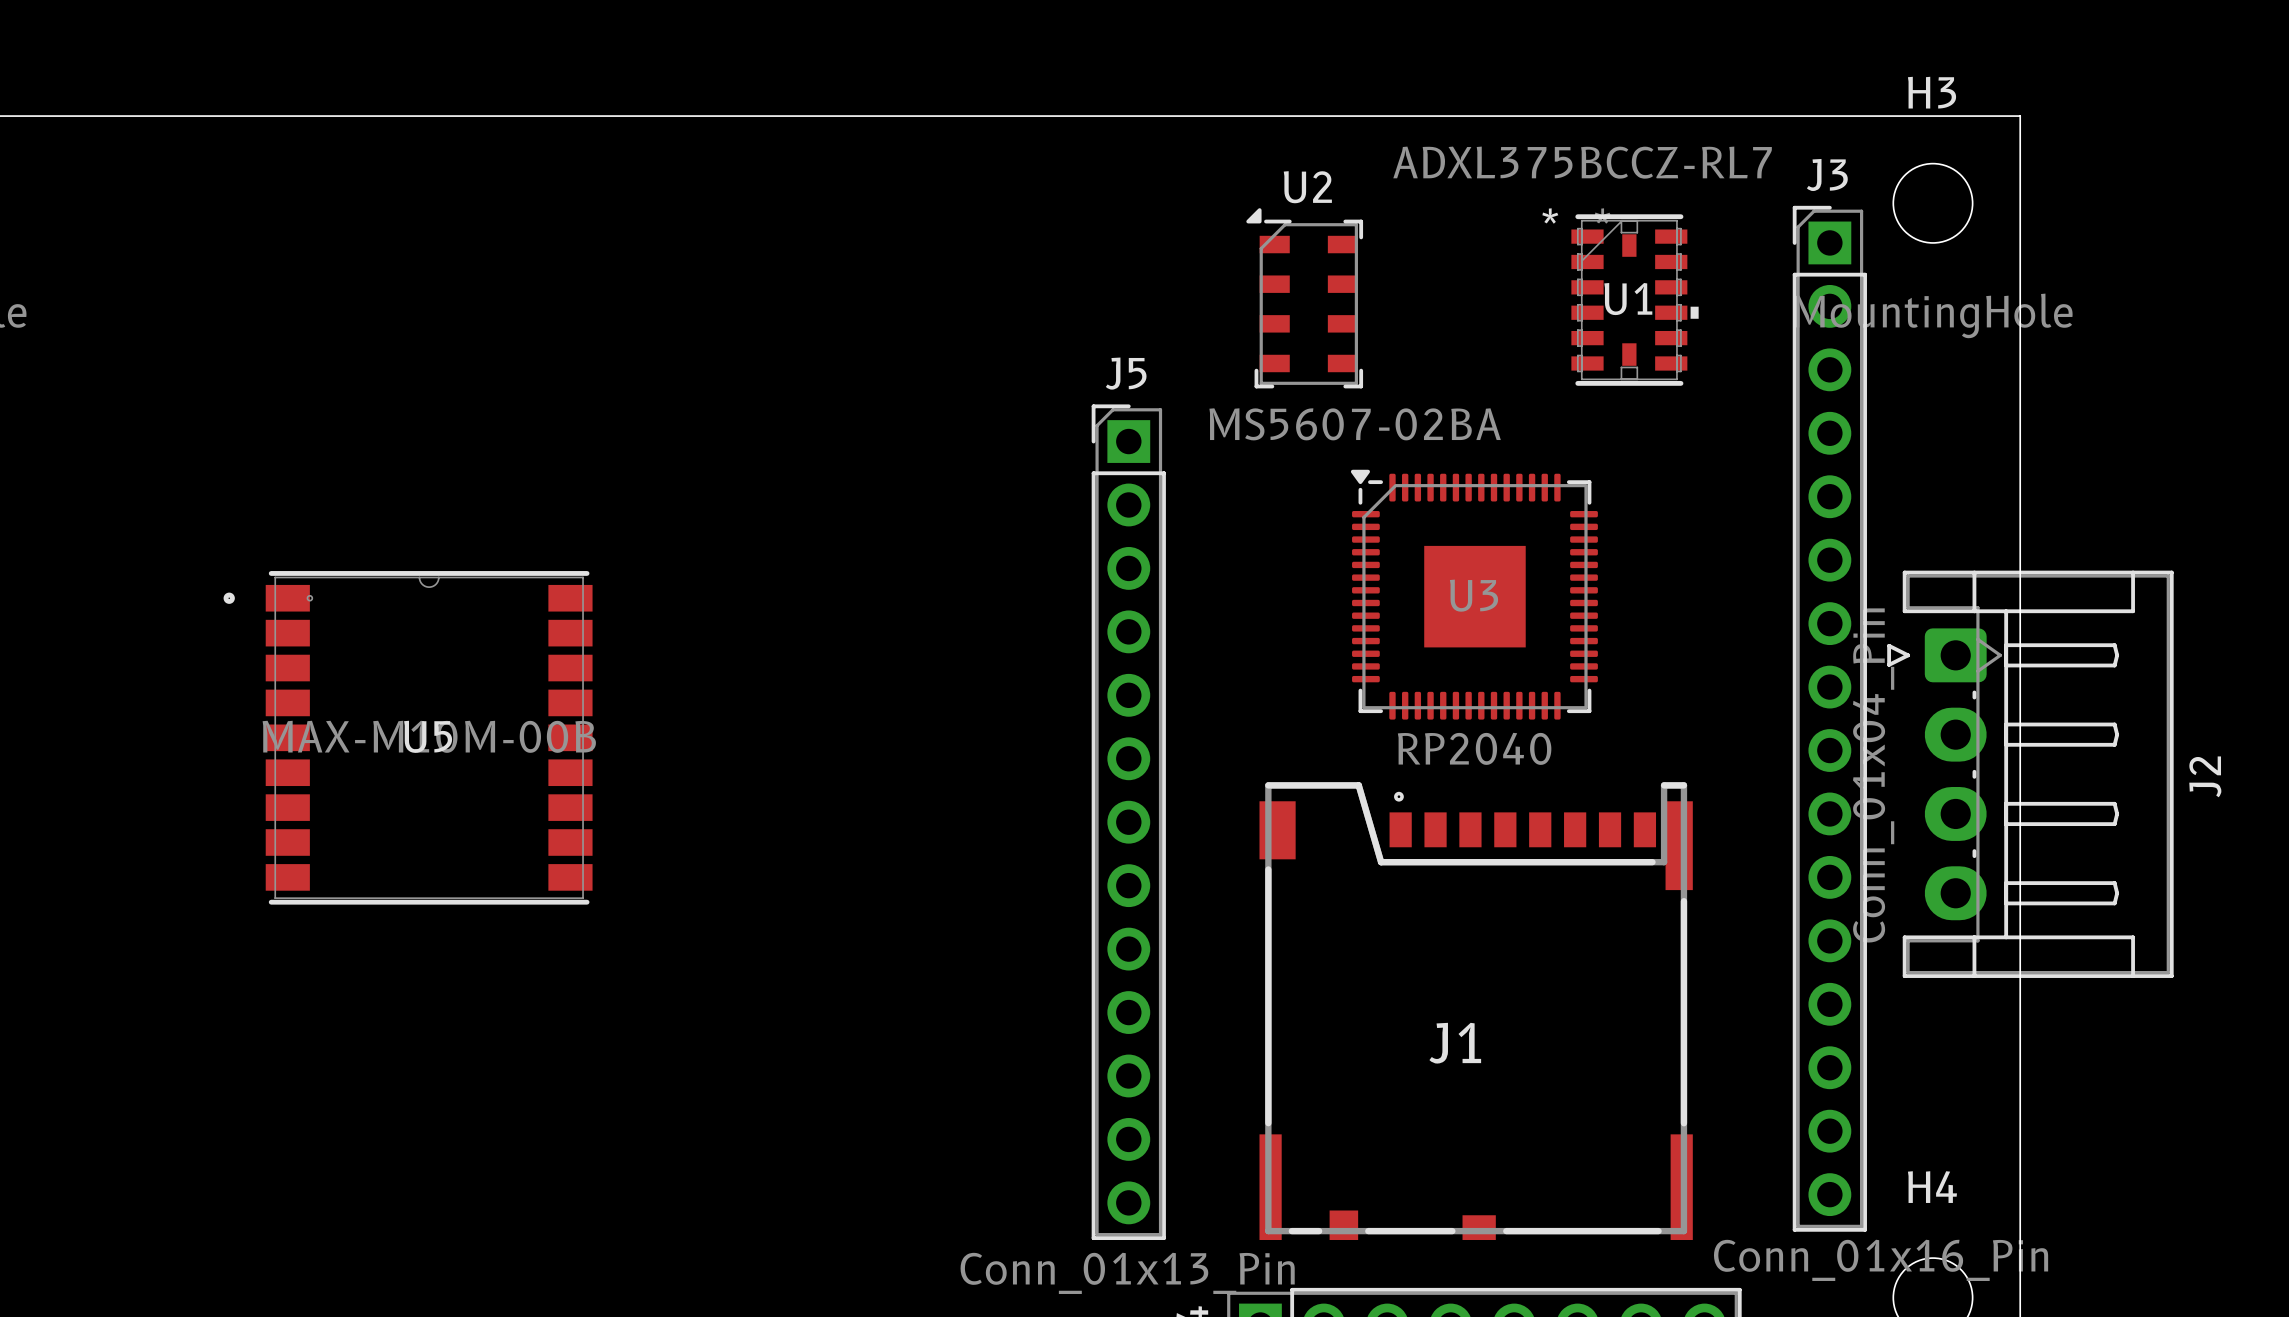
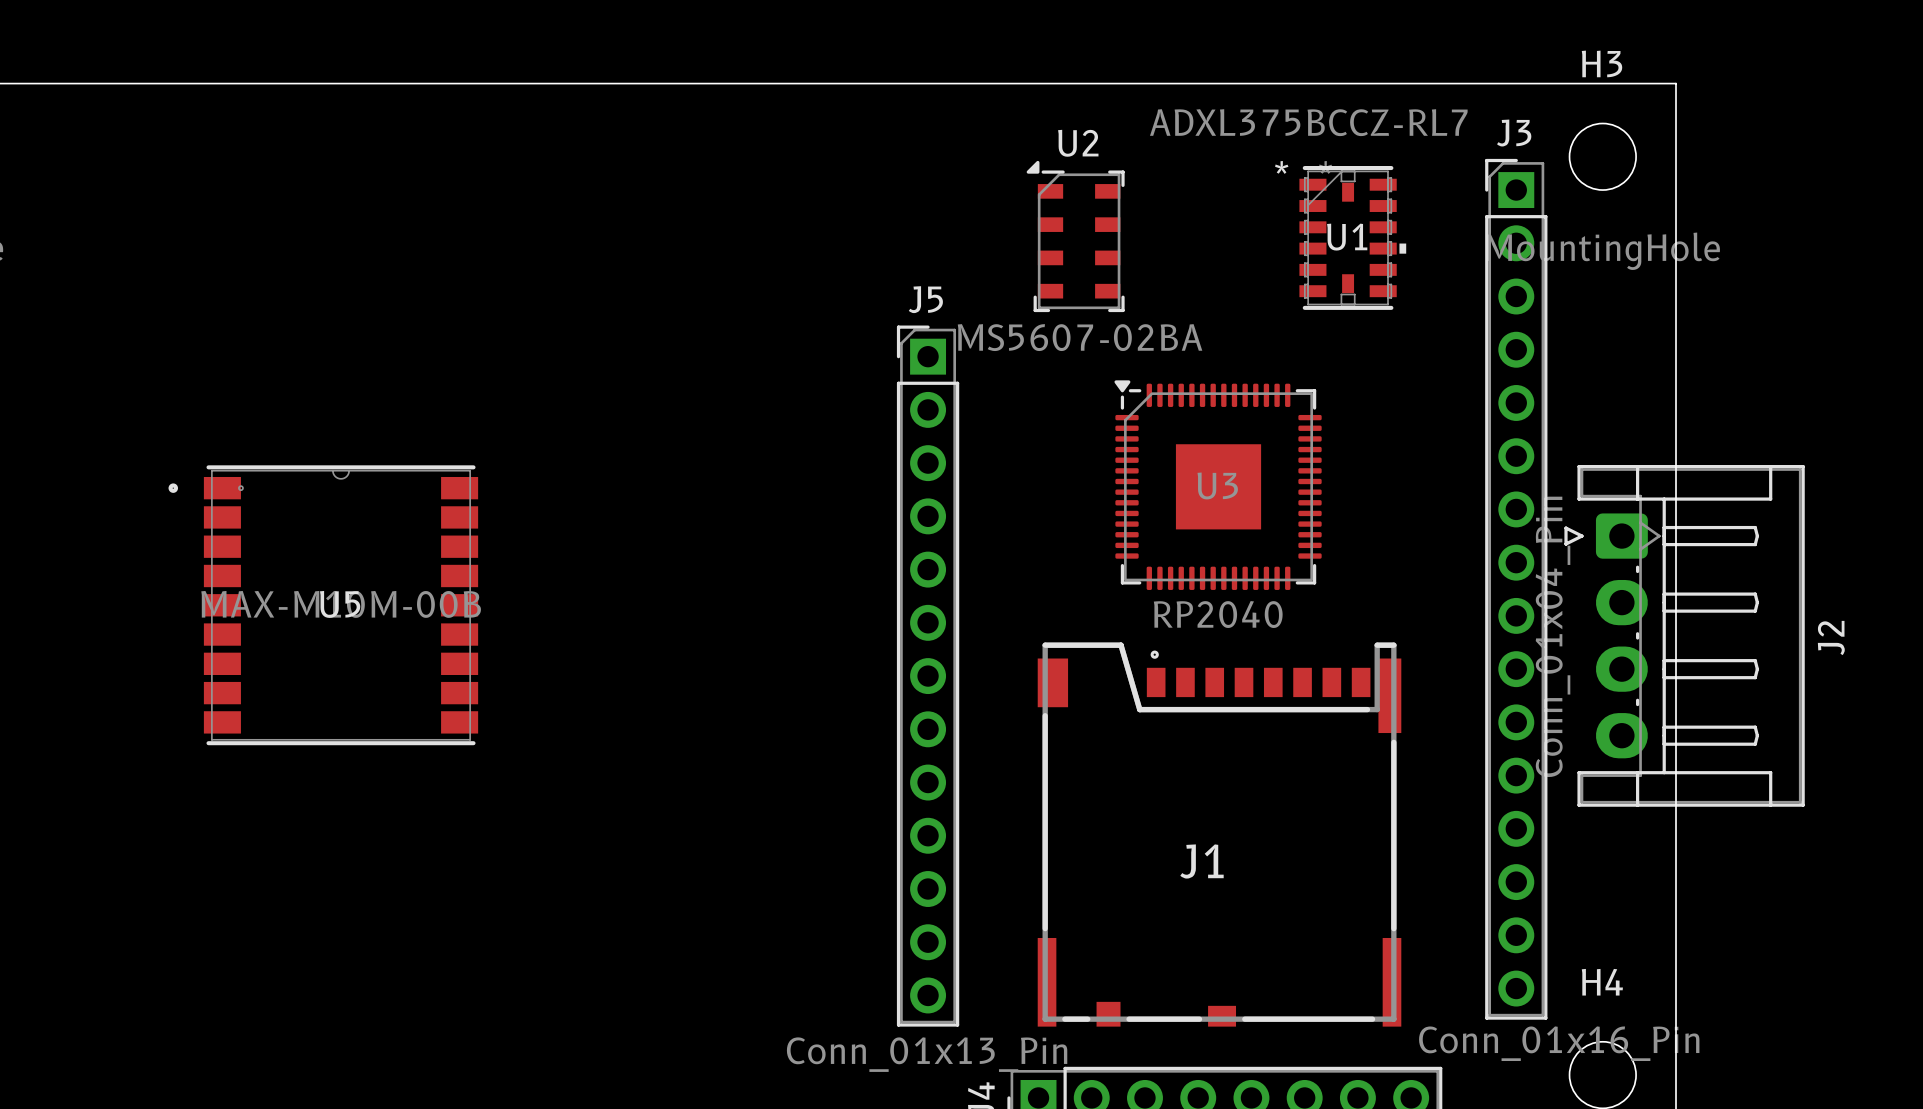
U2 value position: MS5607-02BA (1355, 424) -> MS5607-02BA (1080, 337)

